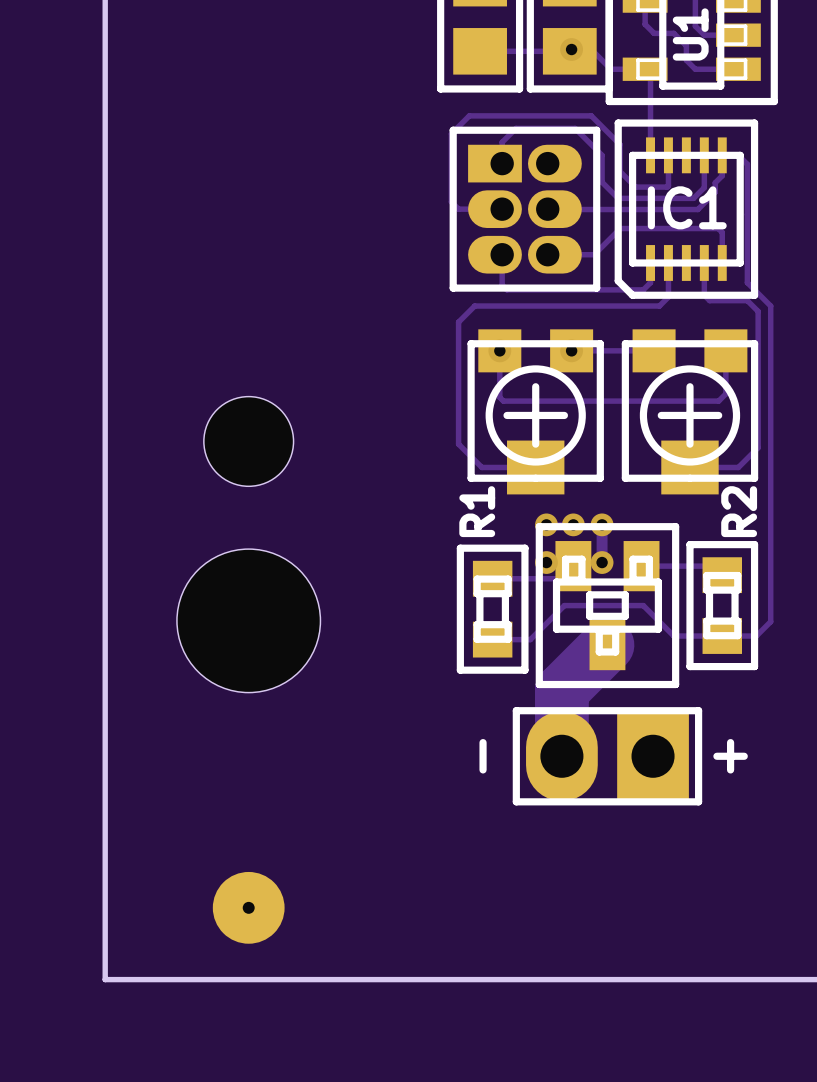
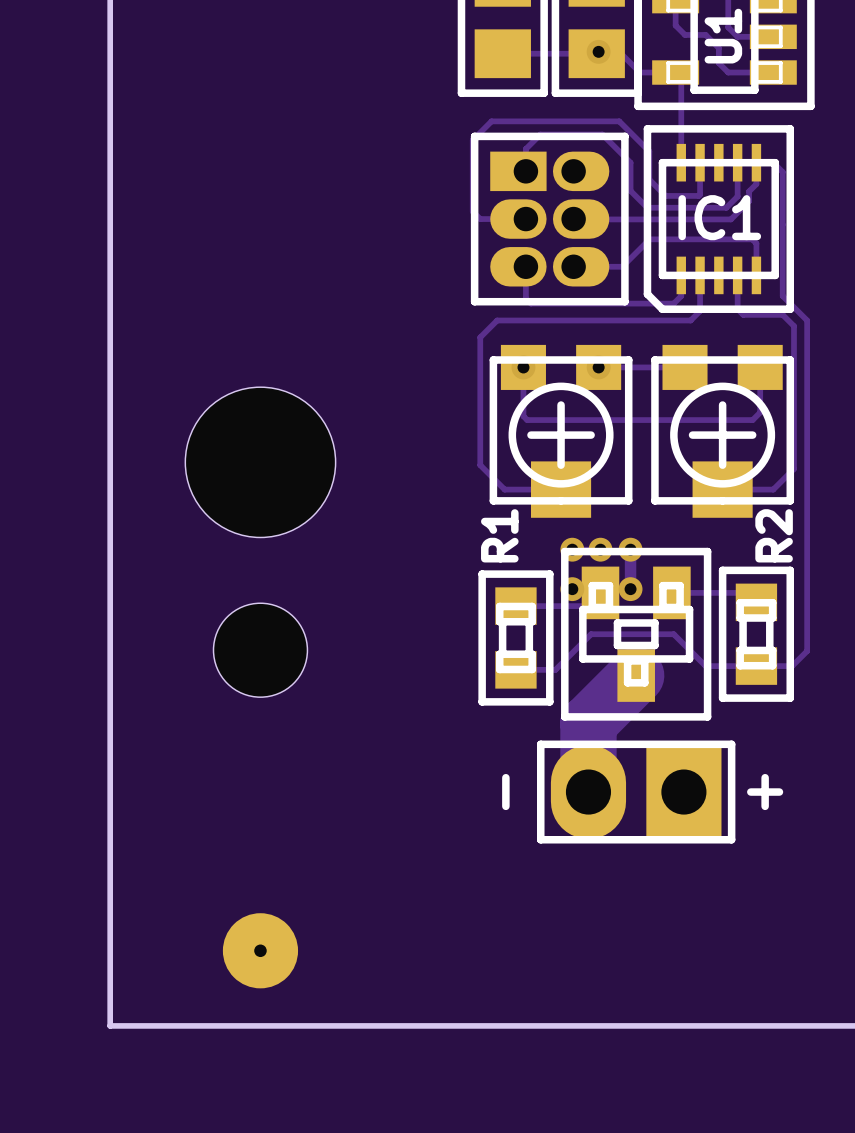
part footprint: [203, 396, 294, 487] -> [185, 387, 336, 538]
part footprint: [176, 549, 321, 693] -> [213, 603, 308, 698]

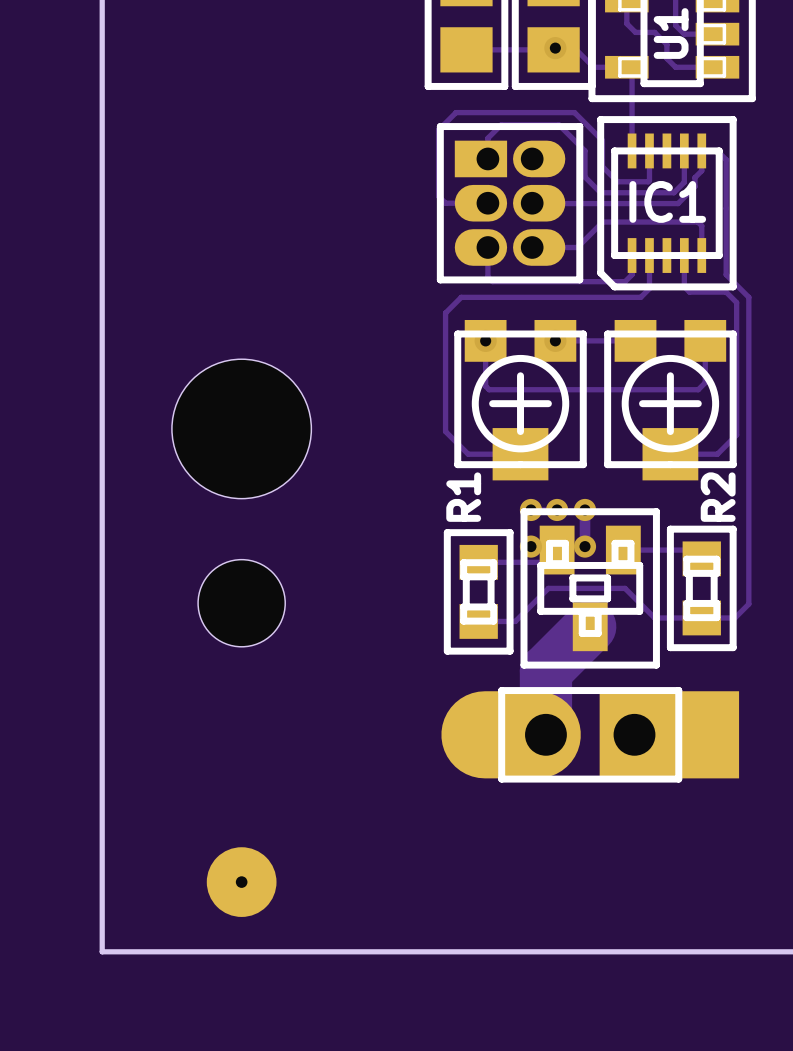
part footprint: [537, 740, 736, 844] -> [441, 687, 740, 783]
text: - (505, 792) -> none
text: + (765, 792) -> none

